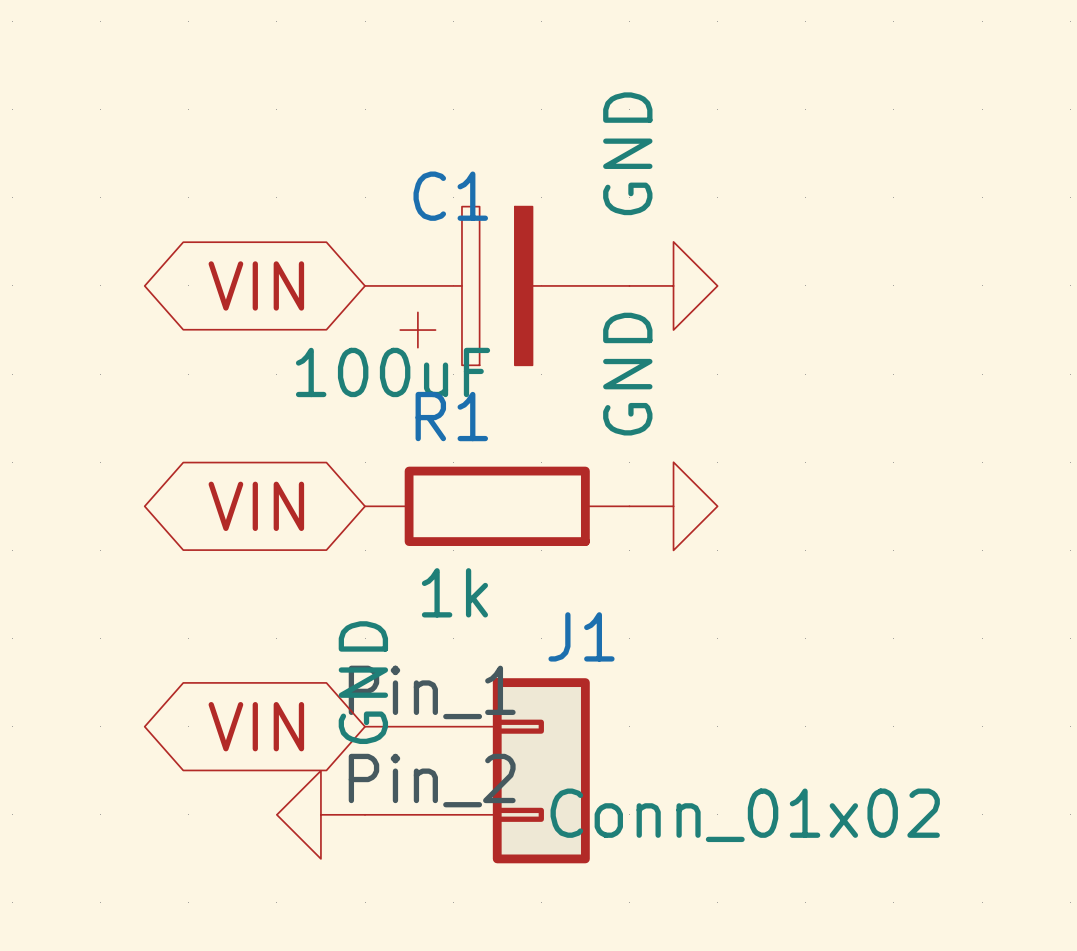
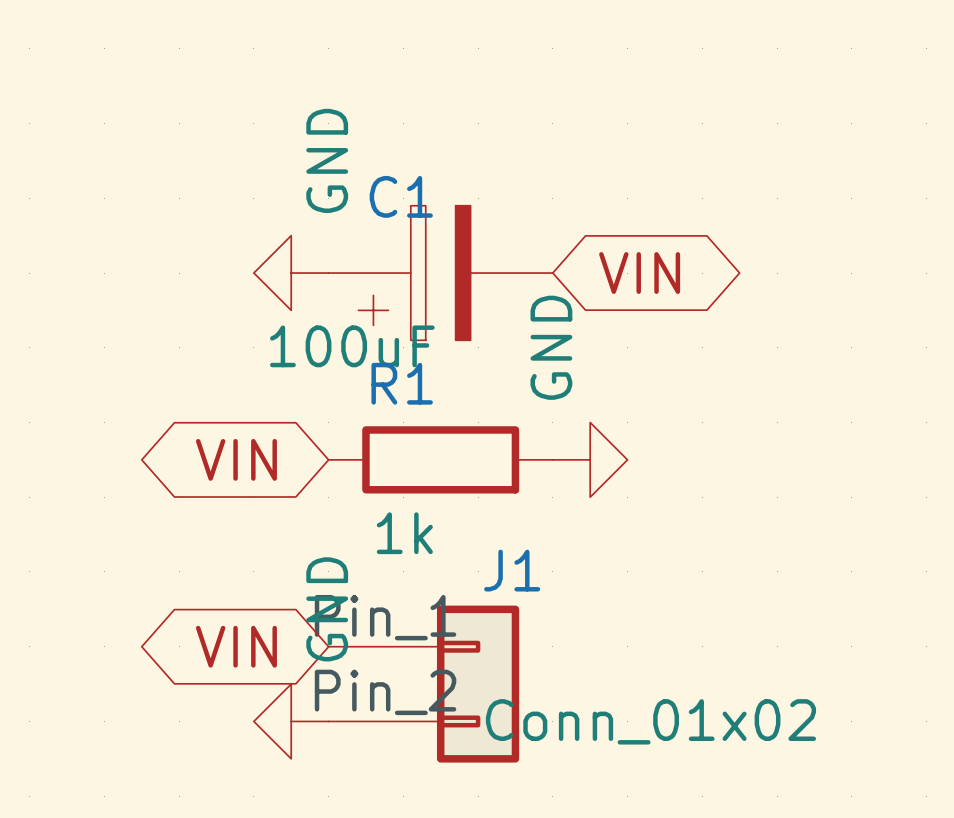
power symbol text position: GND (627, 153) -> GND (327, 160)
global label rotation: 0° (256, 285) -> 180° (639, 273)
global label position: VIN (256, 285) -> VIN (639, 273)
power symbol rotation: 0° (673, 285) -> 180° (291, 273)
power symbol position: GND (673, 285) -> GND (291, 273)

